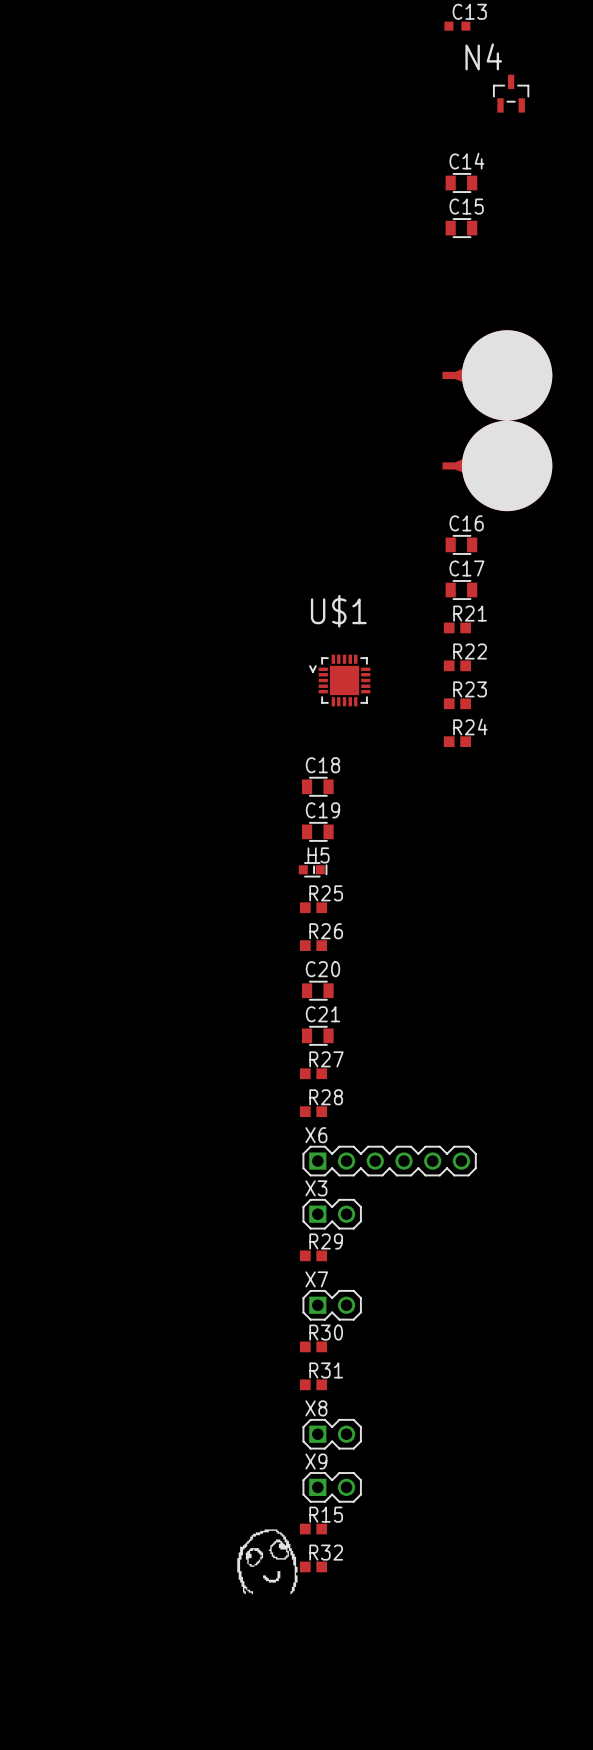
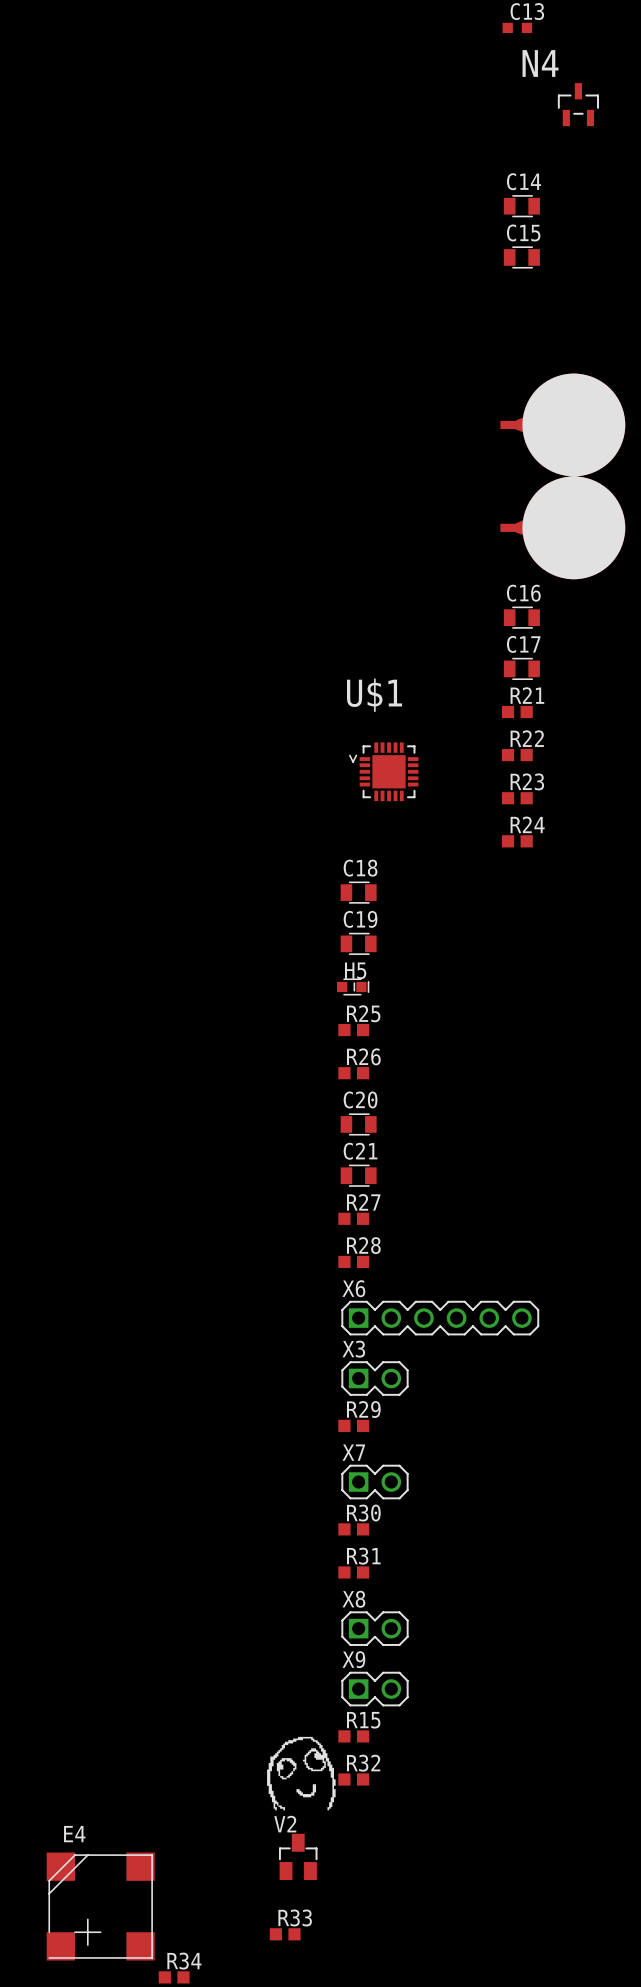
V2: none -> (298, 1856)
E4: none -> (100, 1906)
R33: none -> (285, 1934)
R34: none -> (174, 1977)

